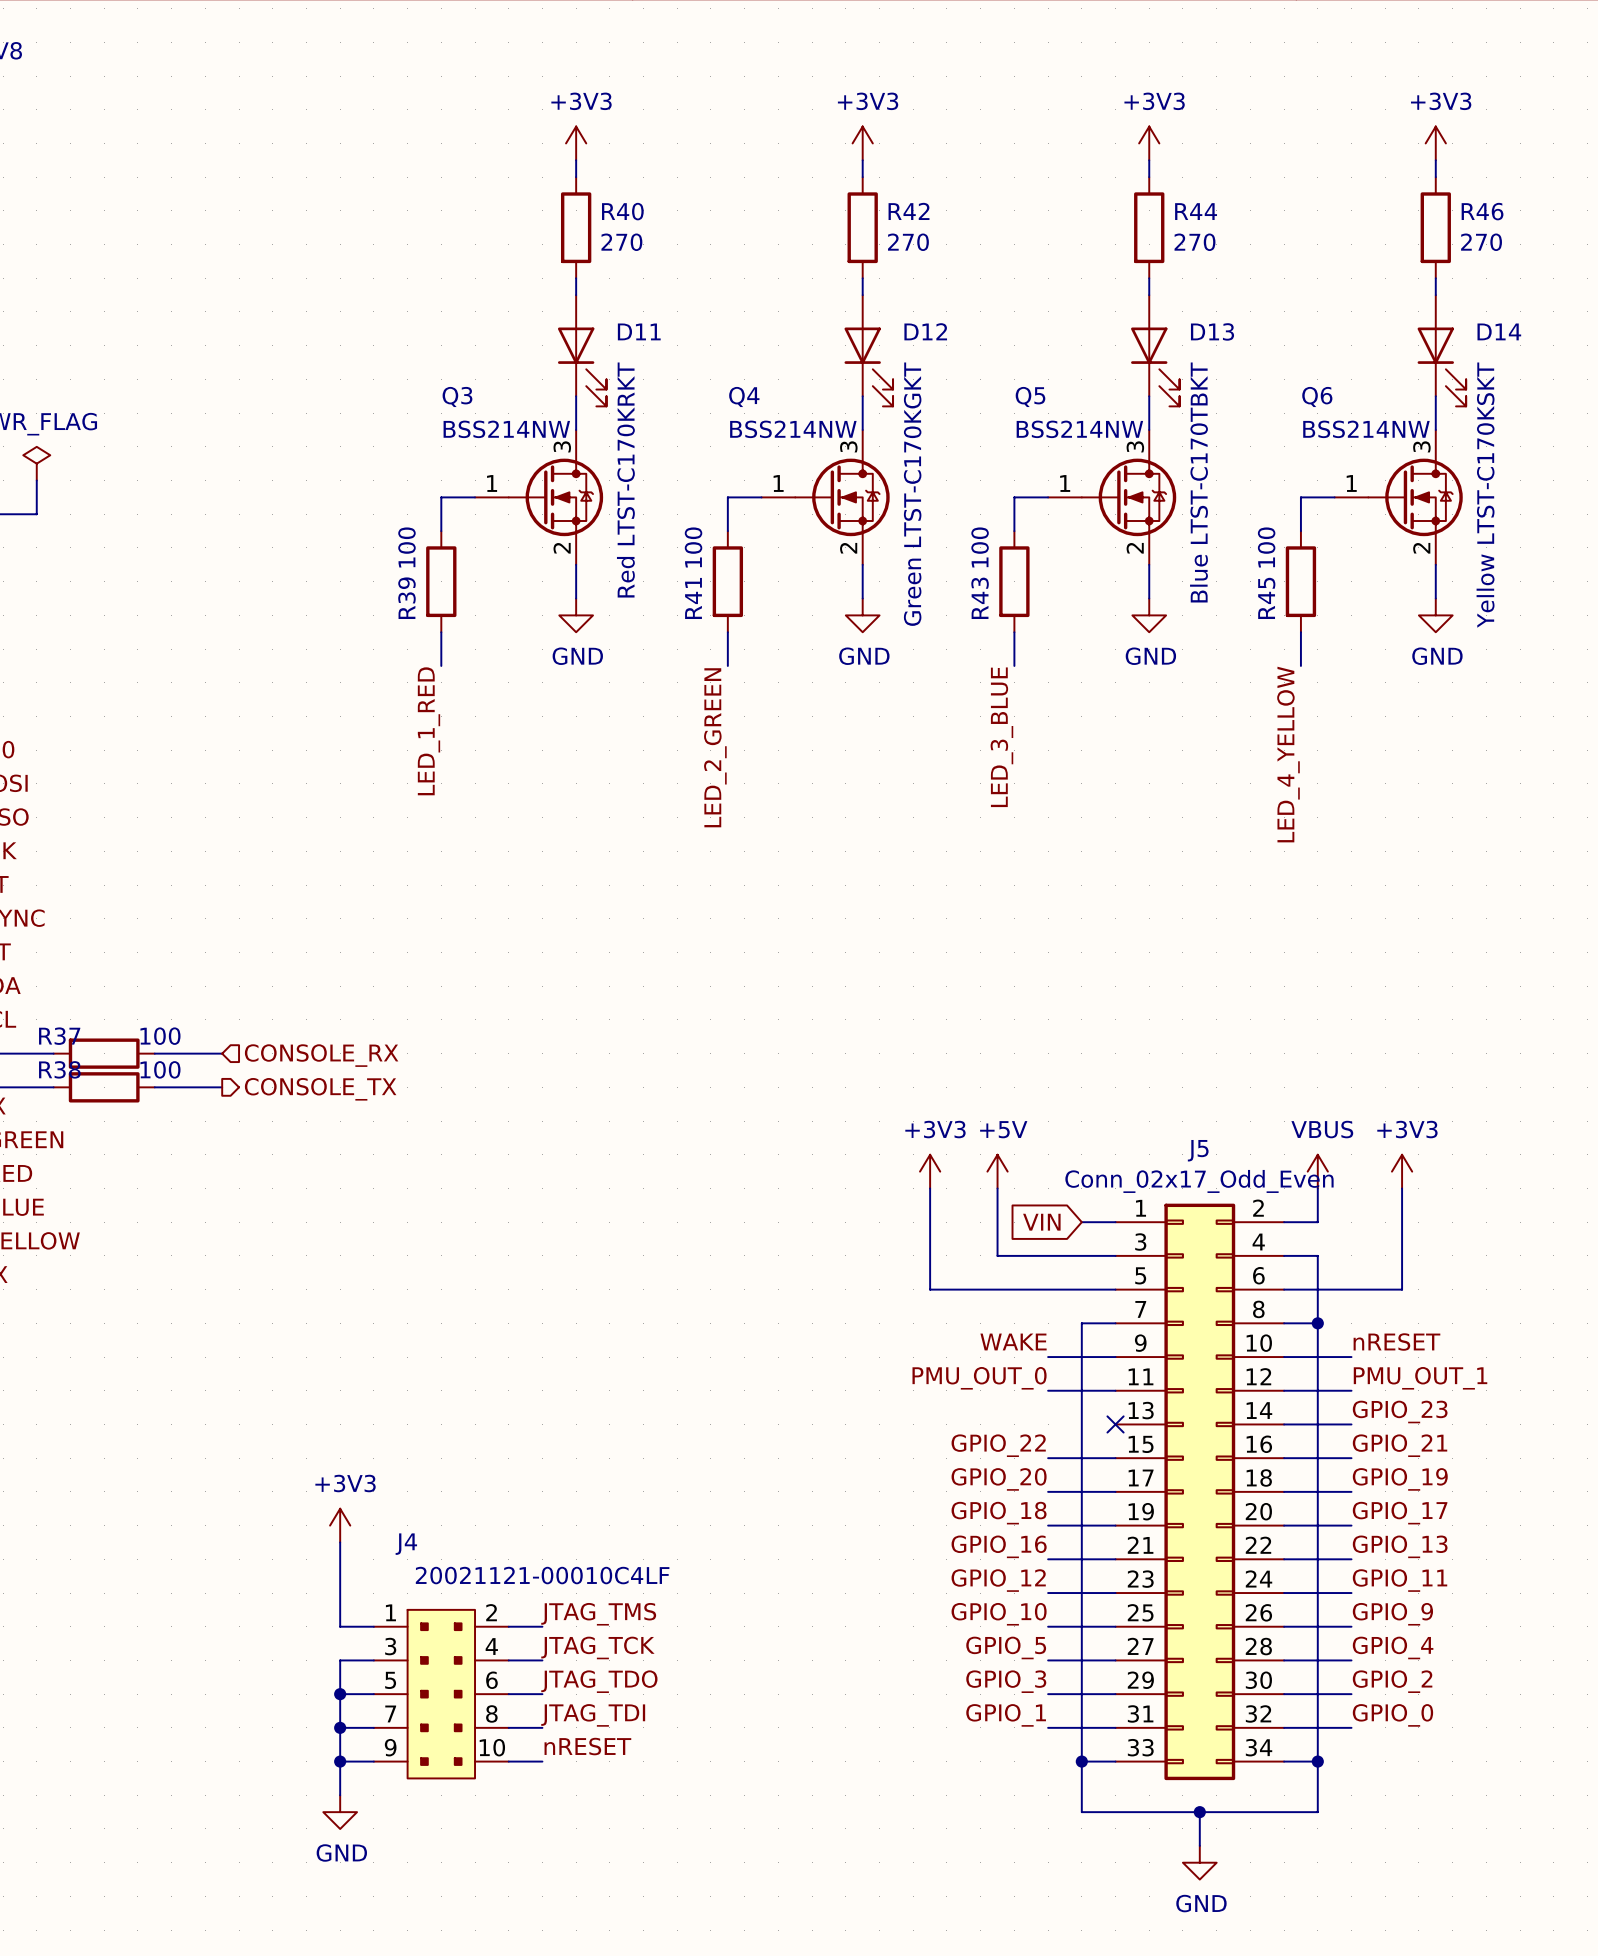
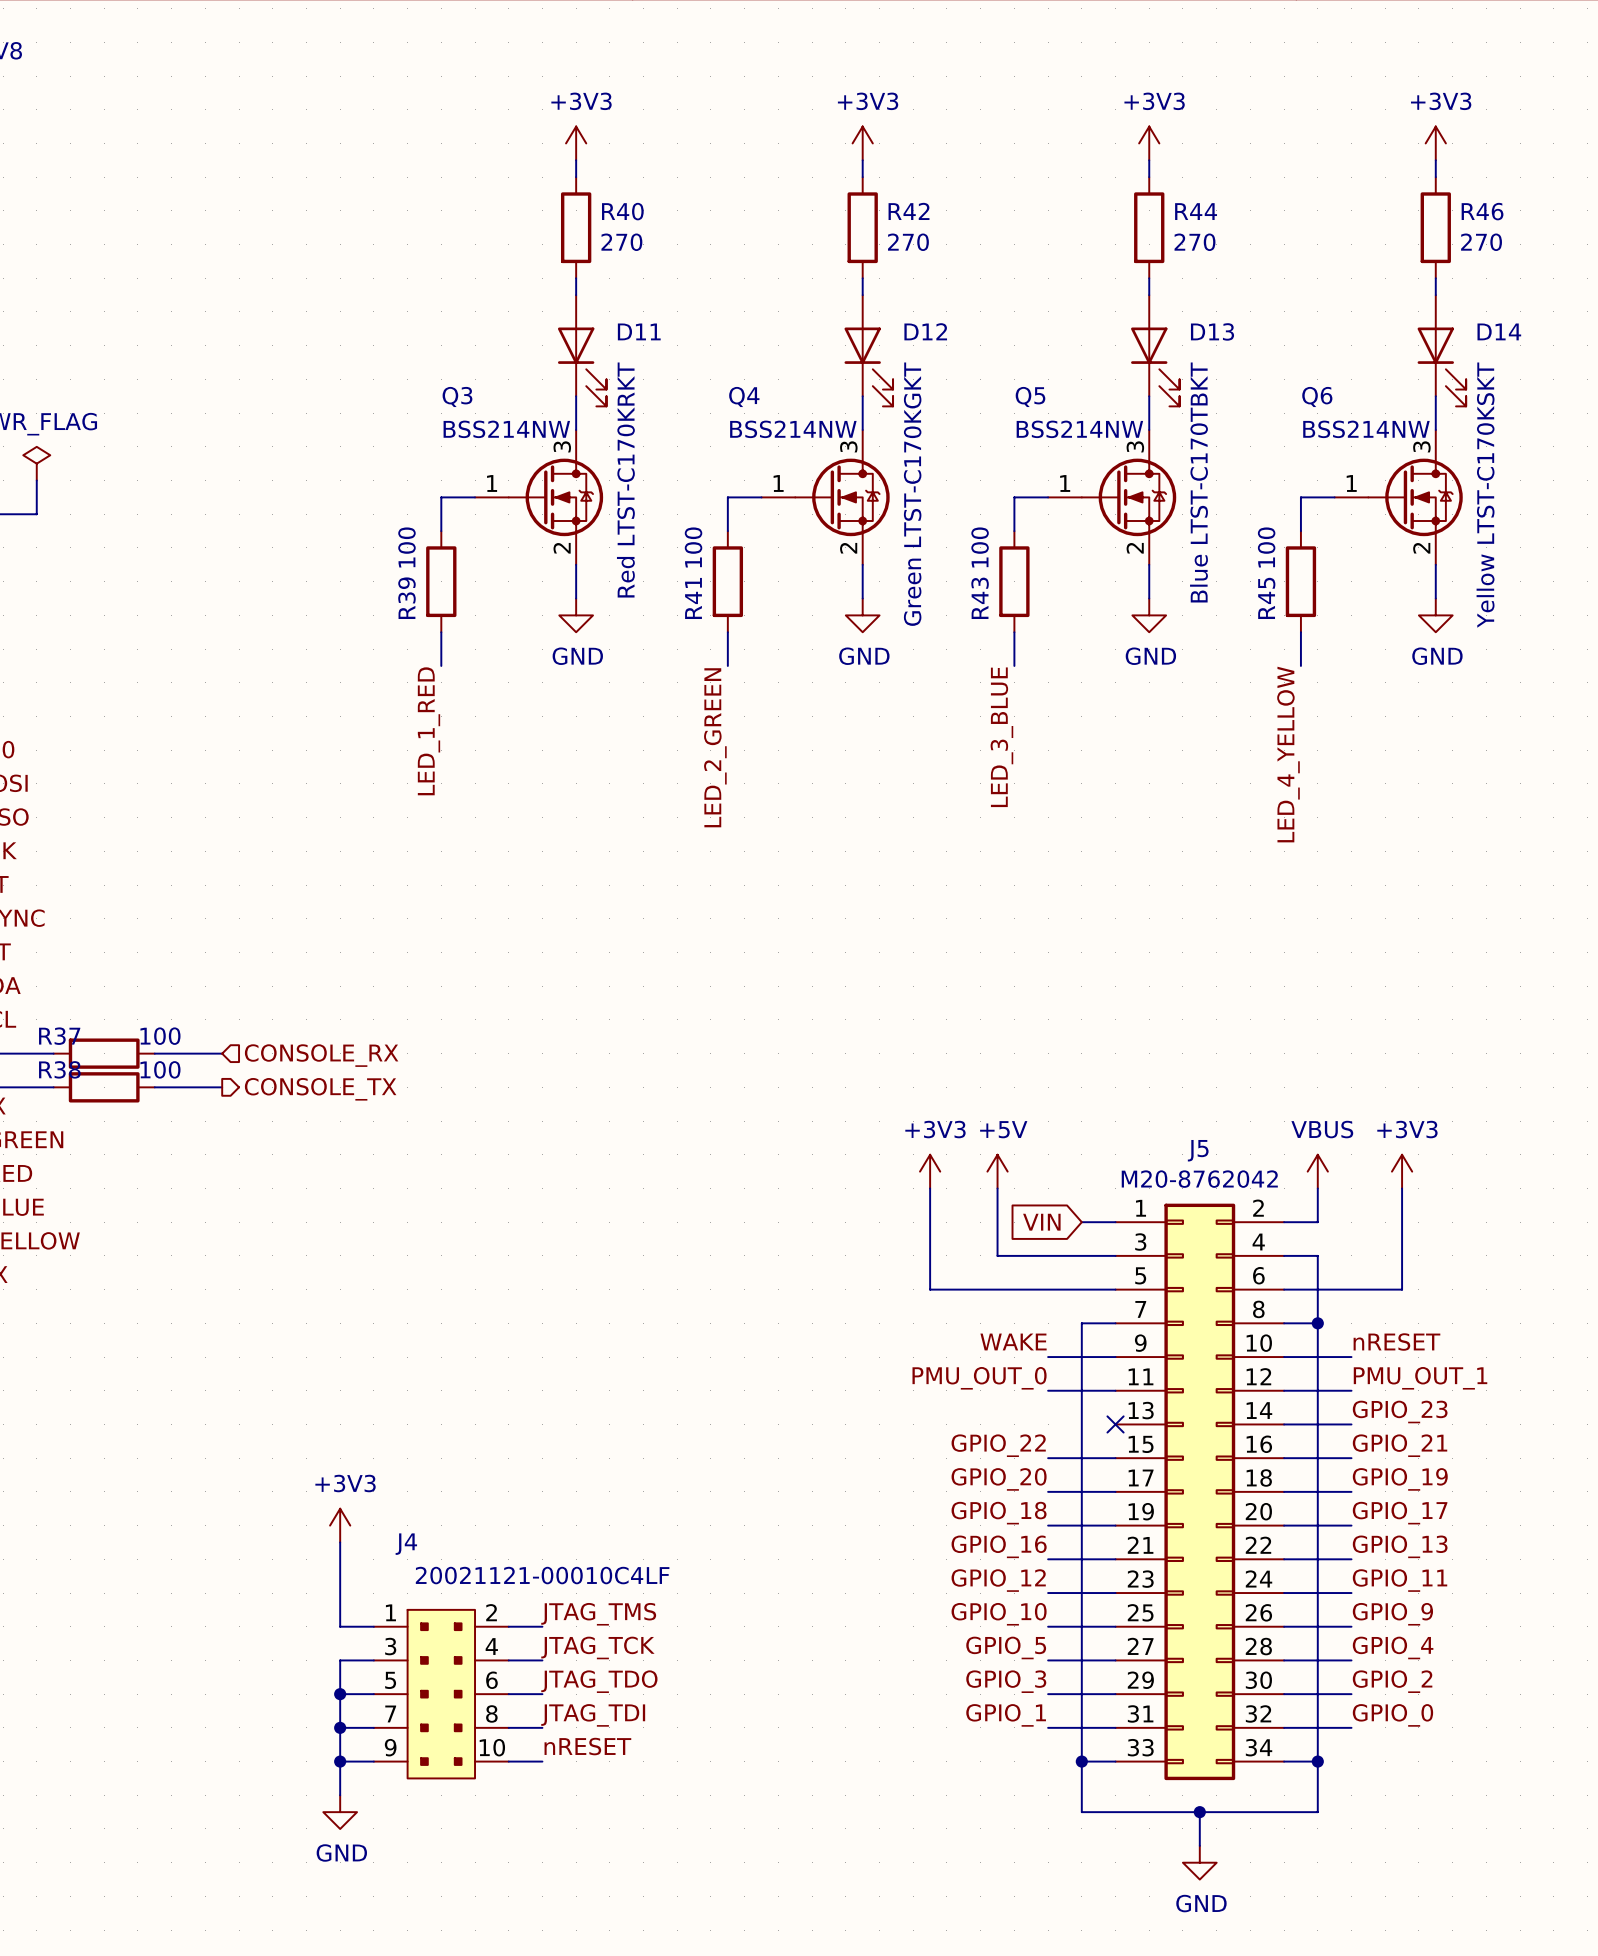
J5 value: Conn_02x17_Odd_Even (1199, 1181) -> M20-8762042 (1199, 1179)

